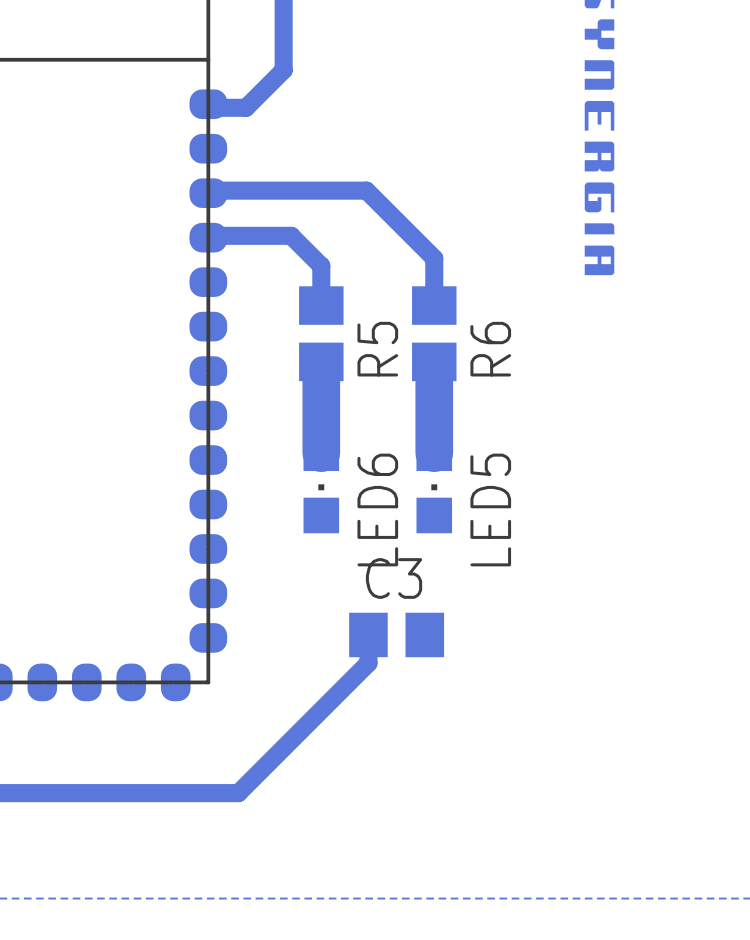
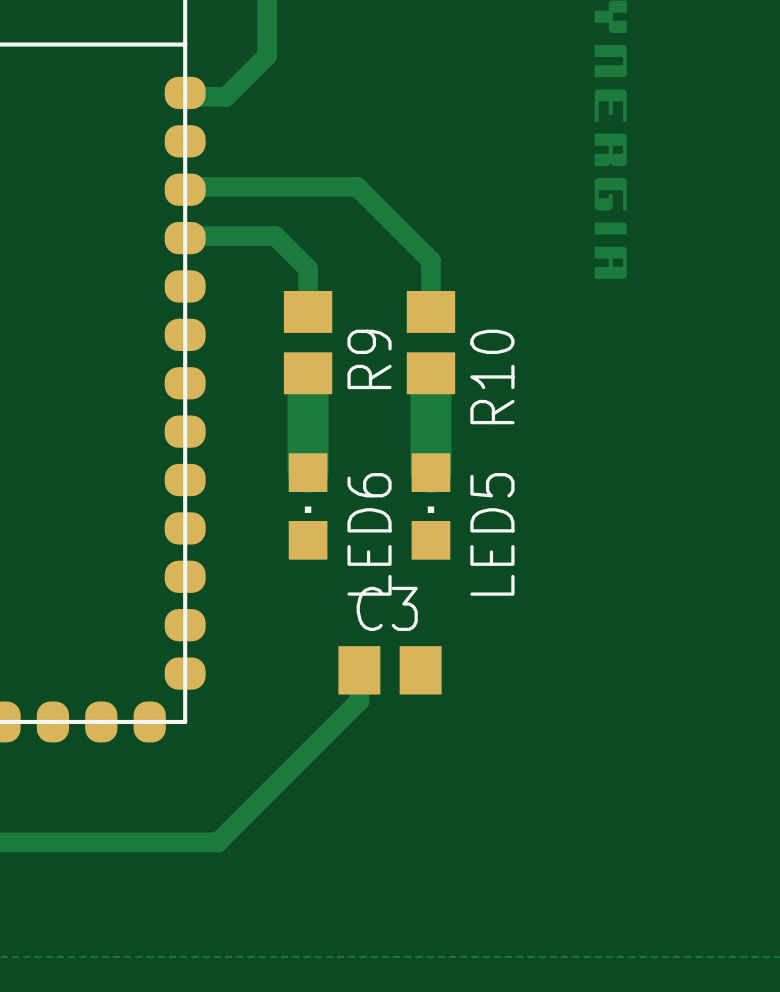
R5 name: R5 (377, 349) -> R9 (369, 359)
R6 name: R6 (490, 349) -> R10 (492, 376)

